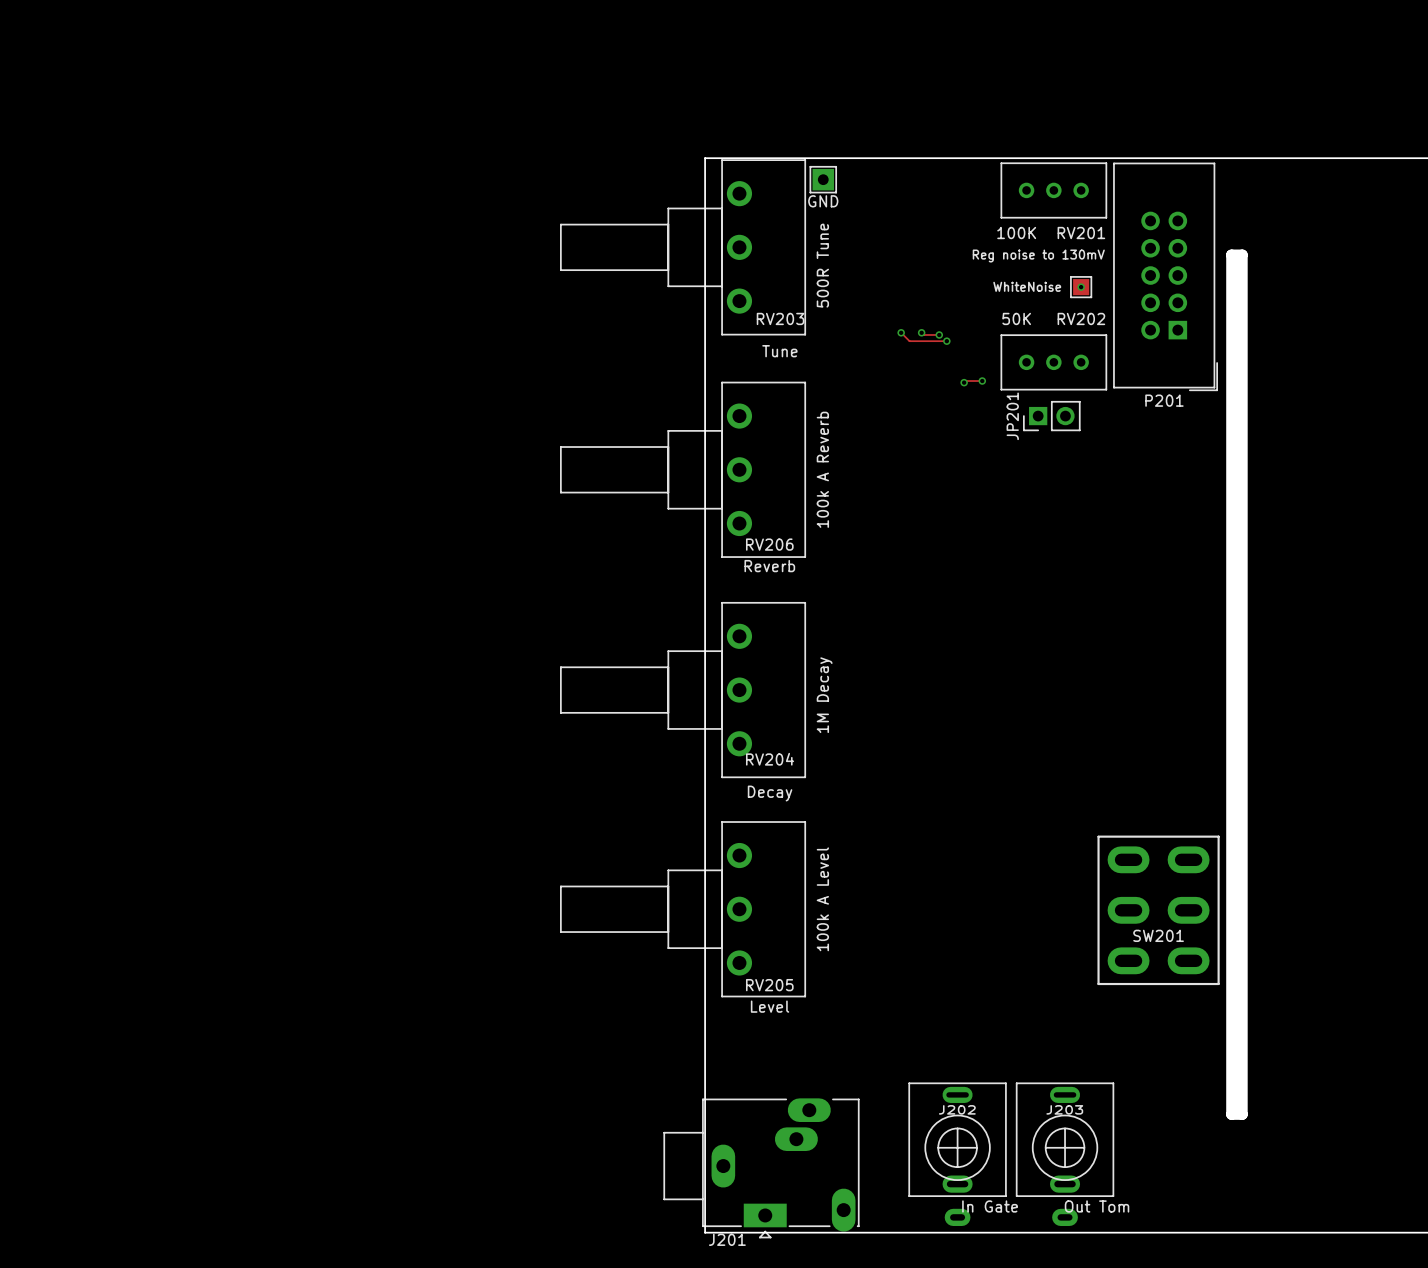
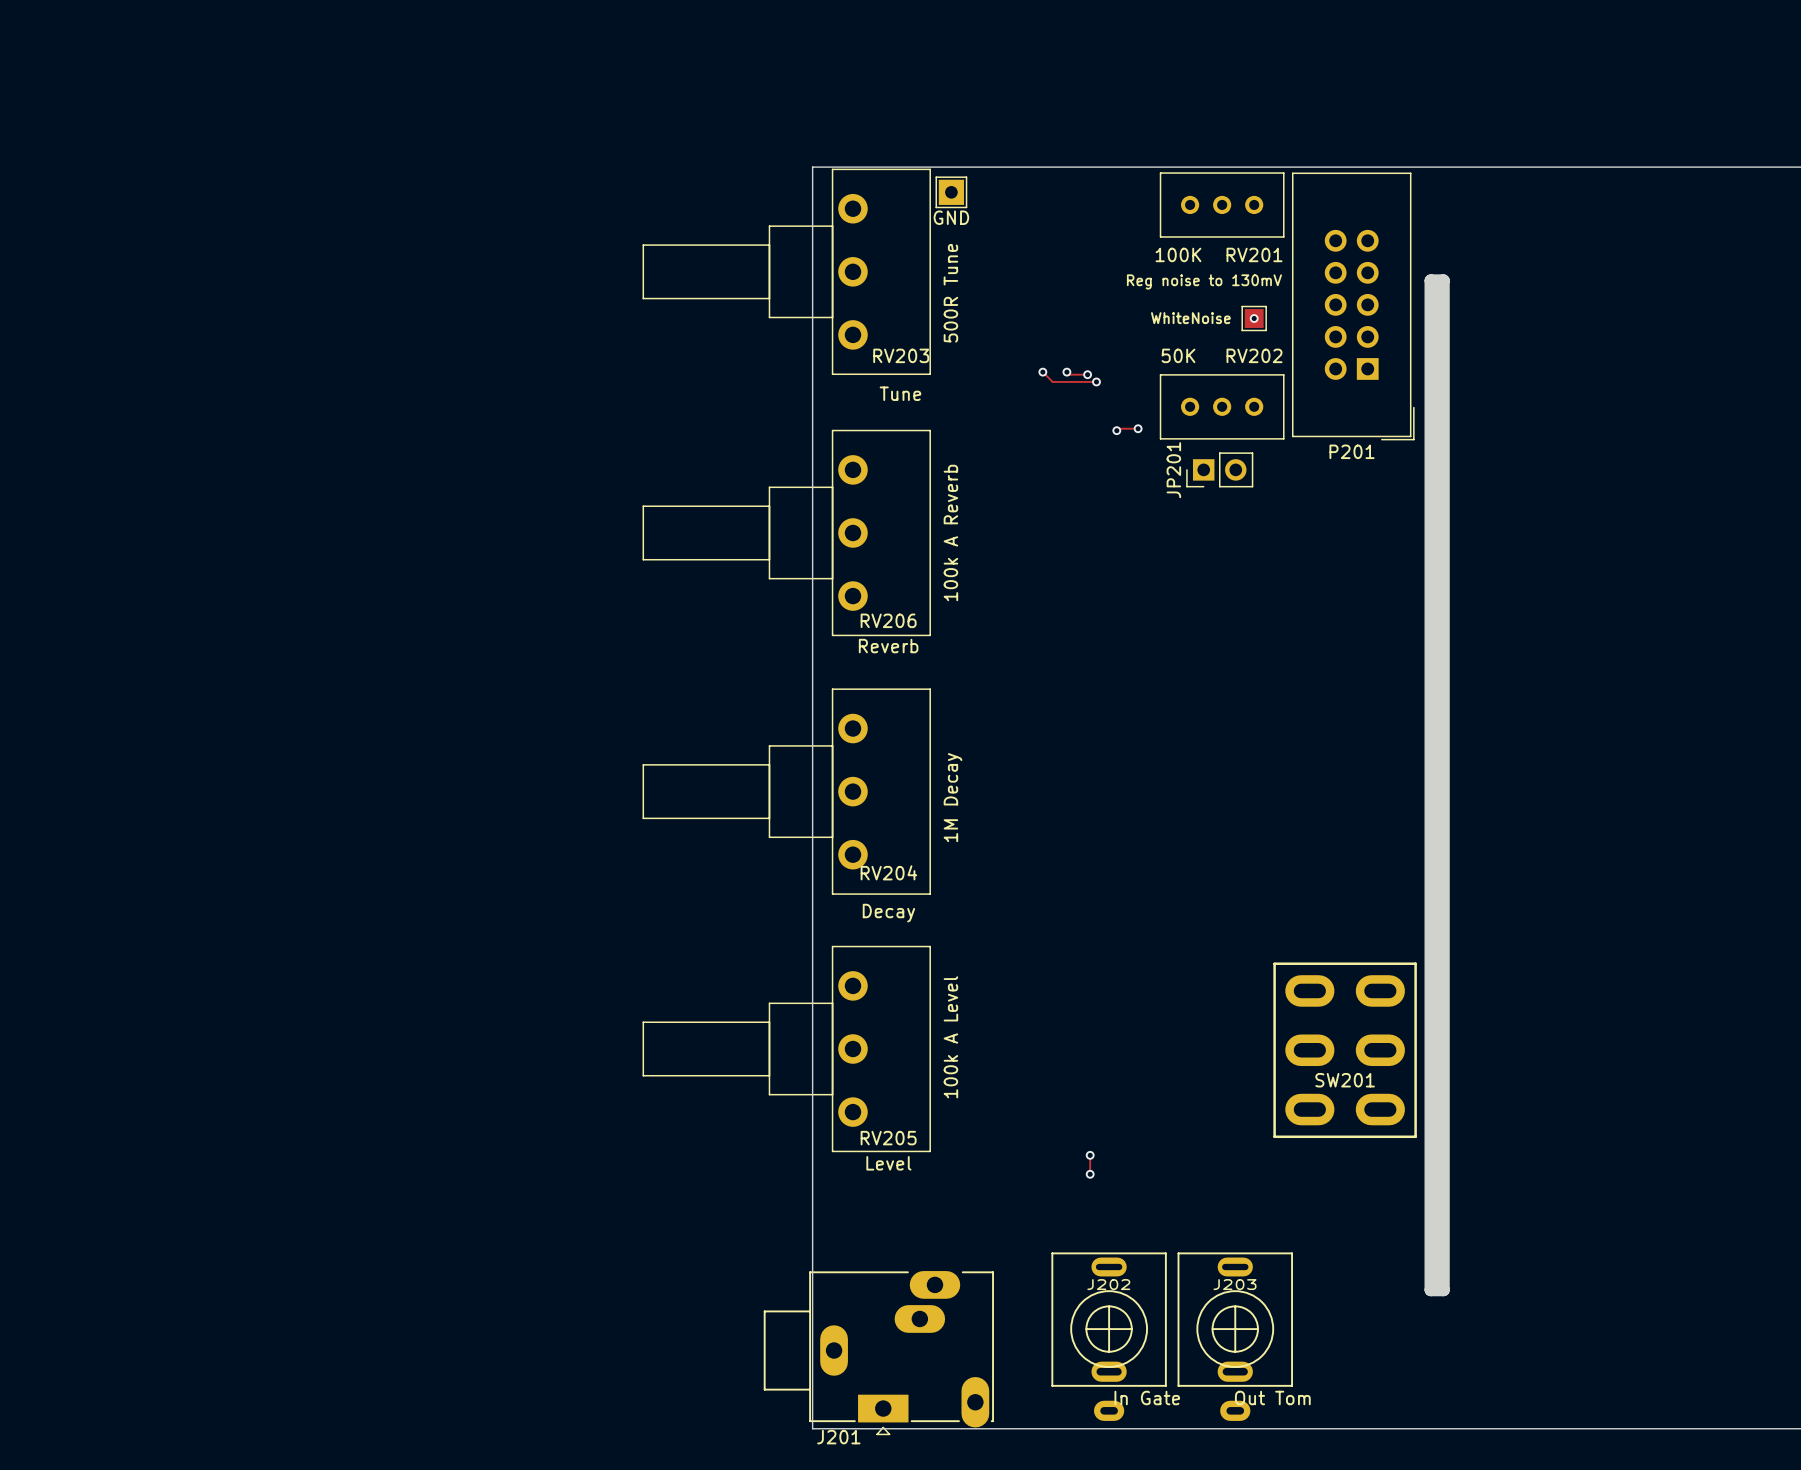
track: none -> (1090, 1155) (1090, 1174)
via: none -> (1090, 1155)
via: none -> (1090, 1174)

